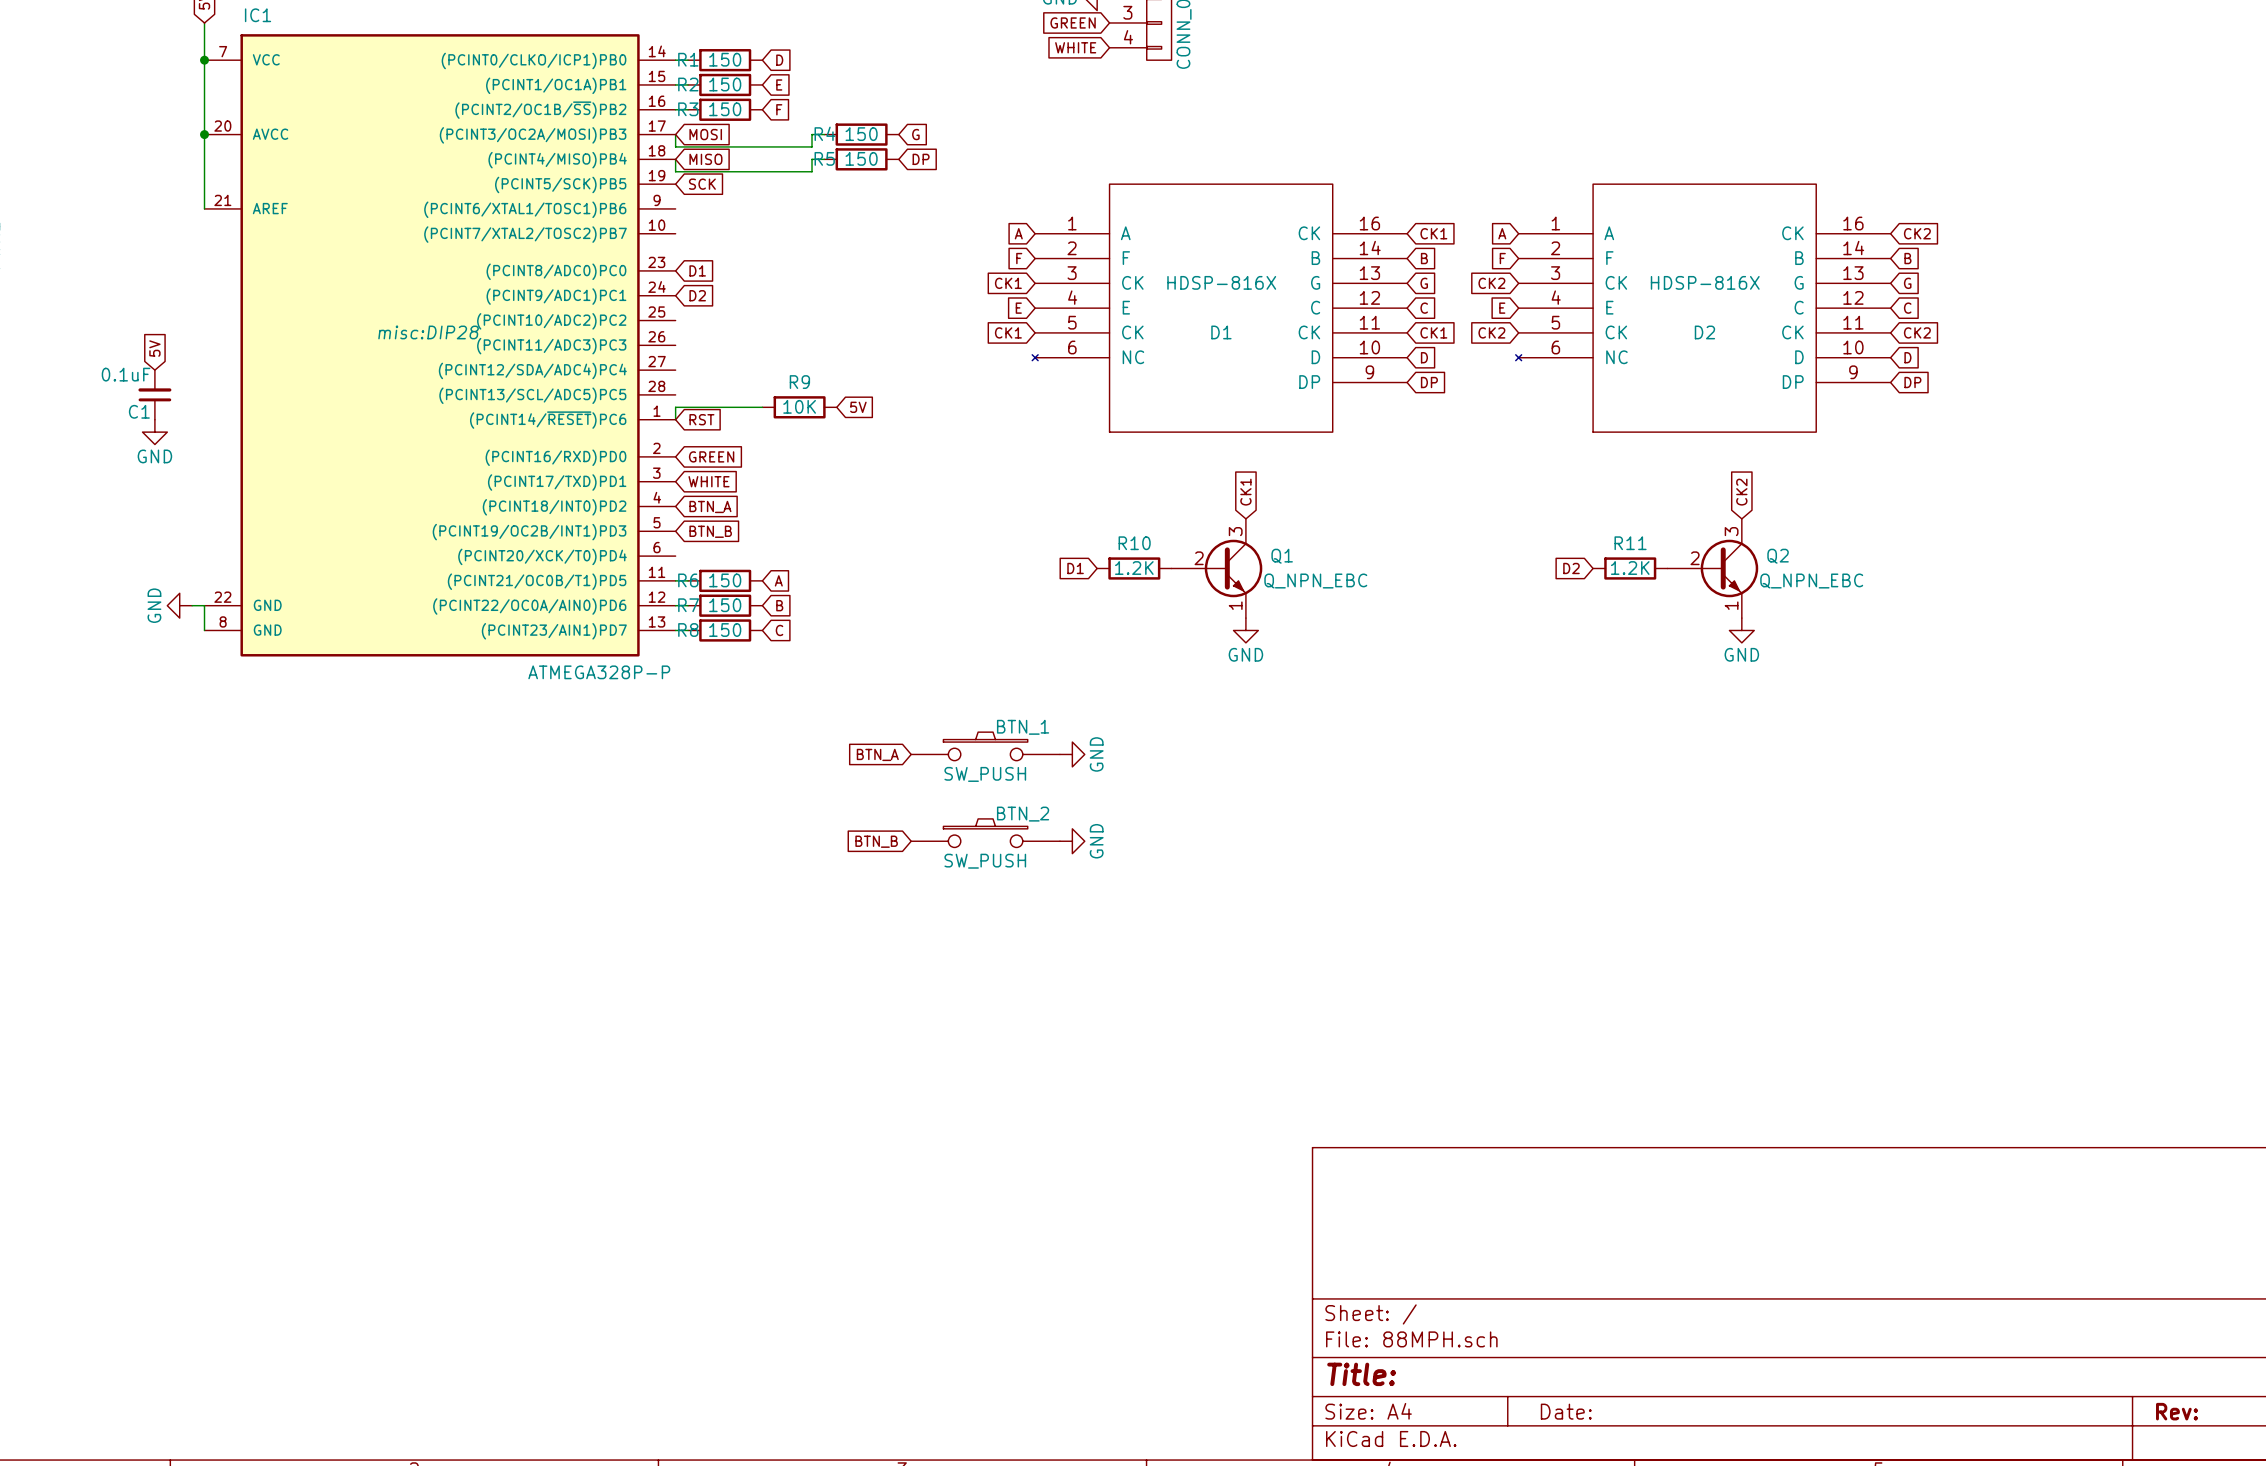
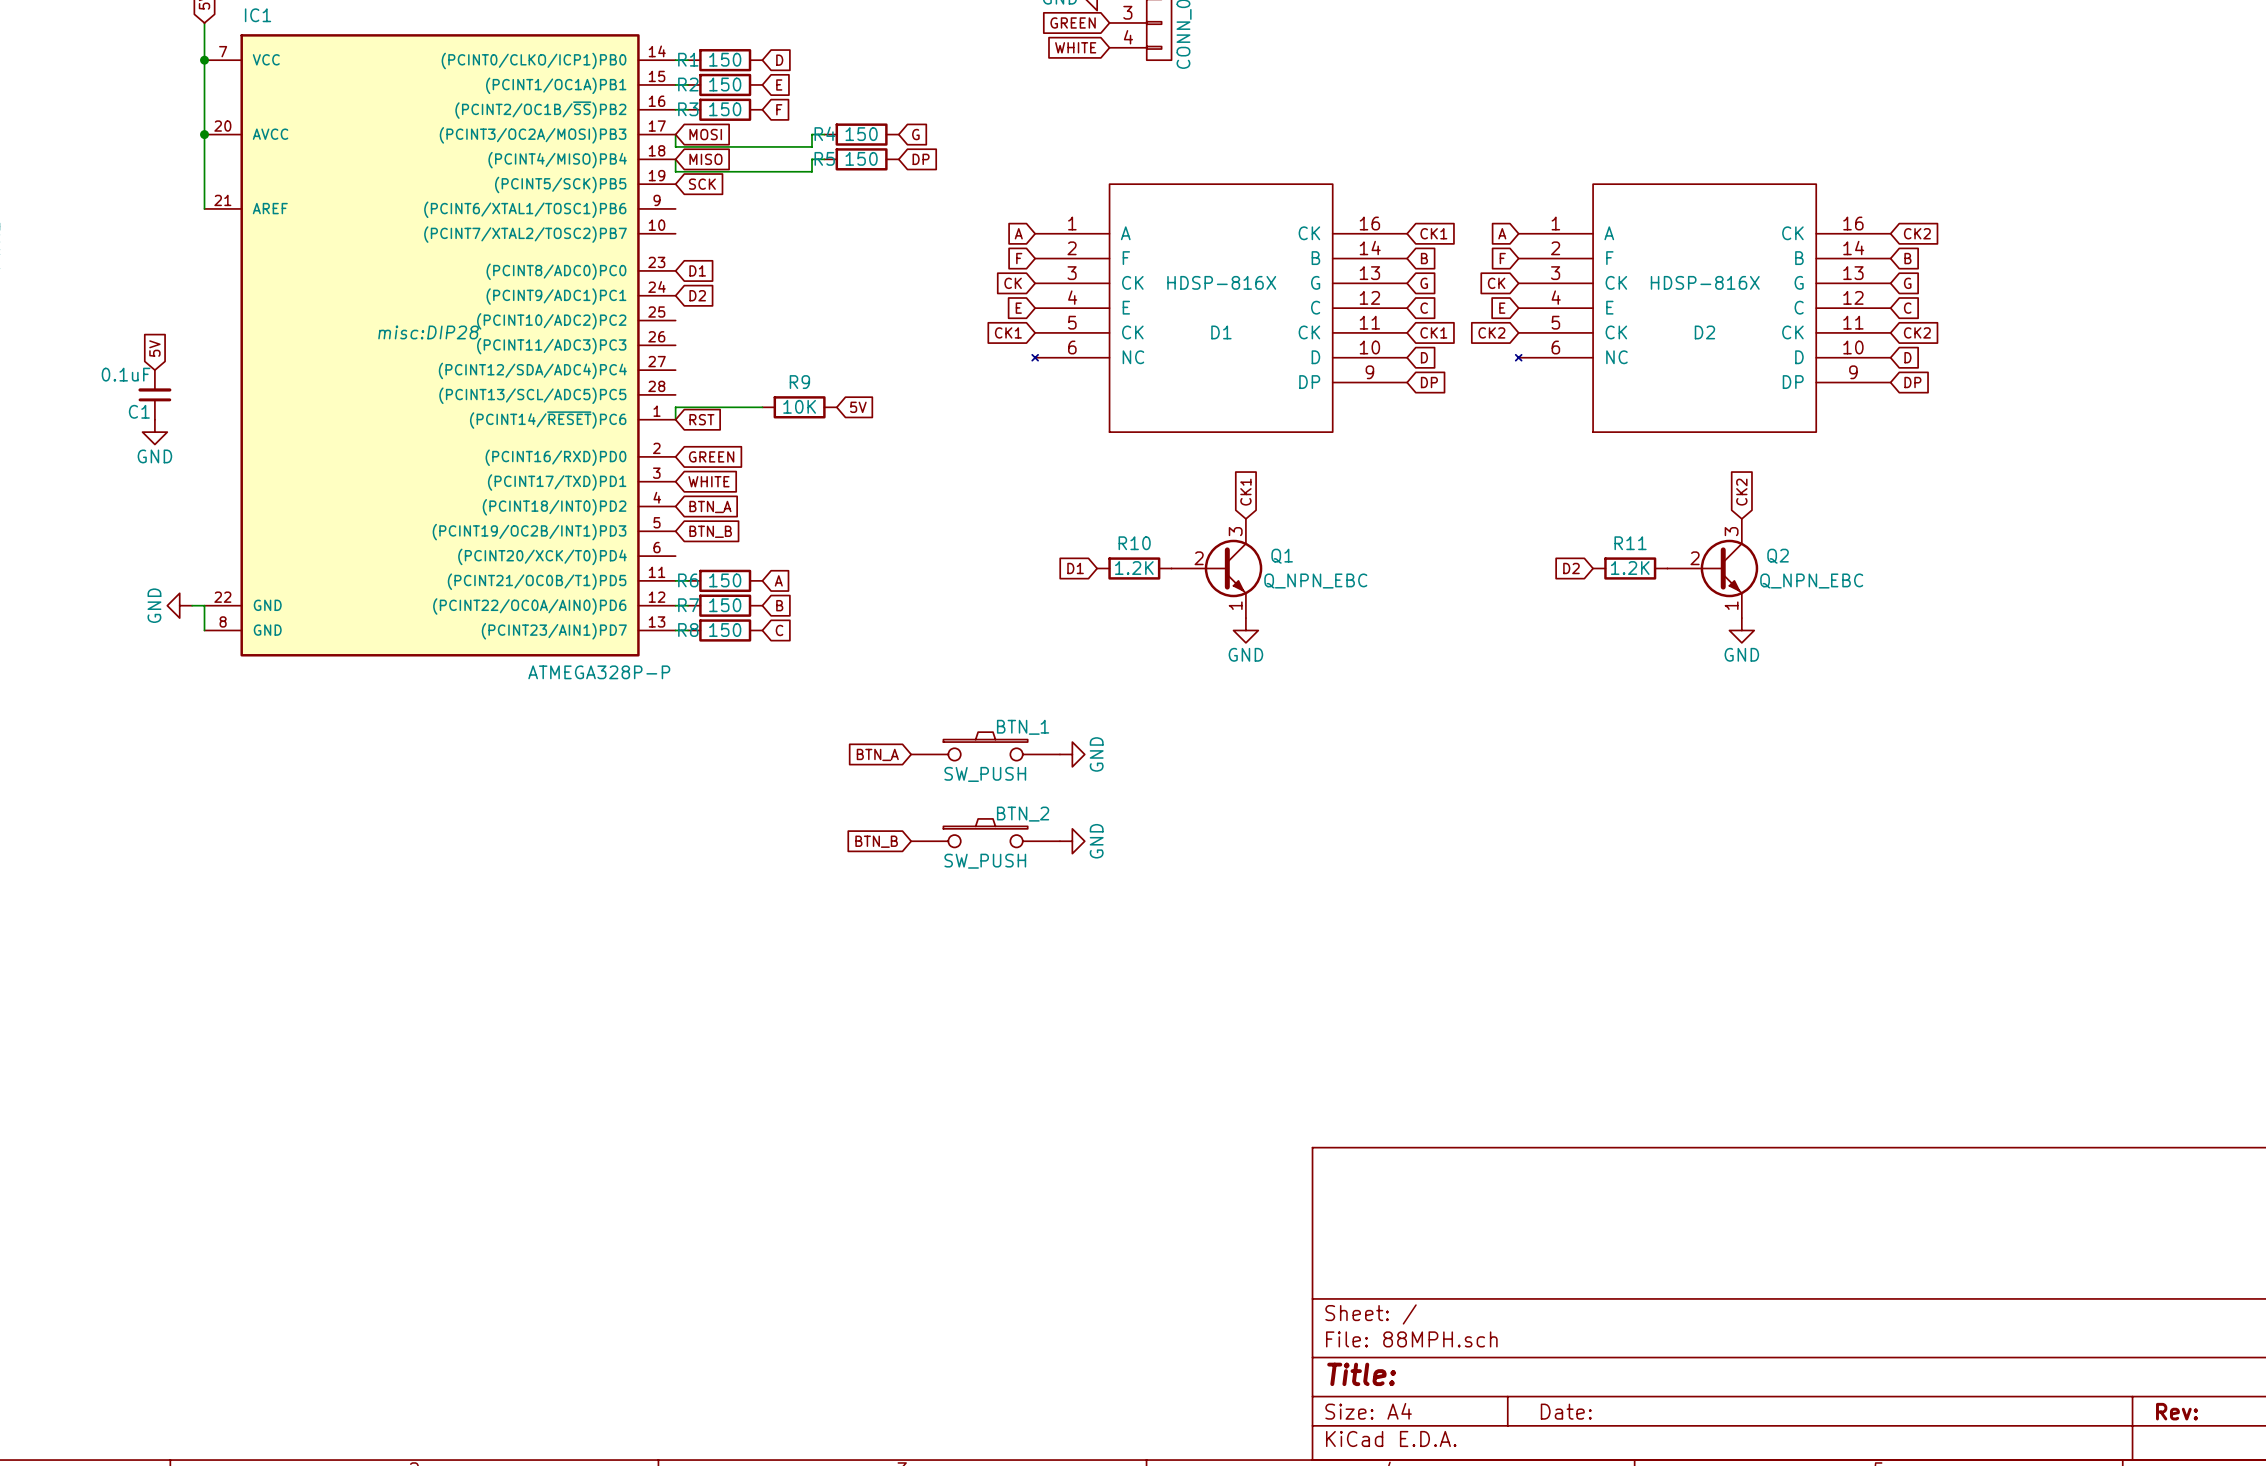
global label: CK1 (1008, 283) -> CK (1013, 283)
global label: CK2 (1491, 283) -> CK (1496, 283)

